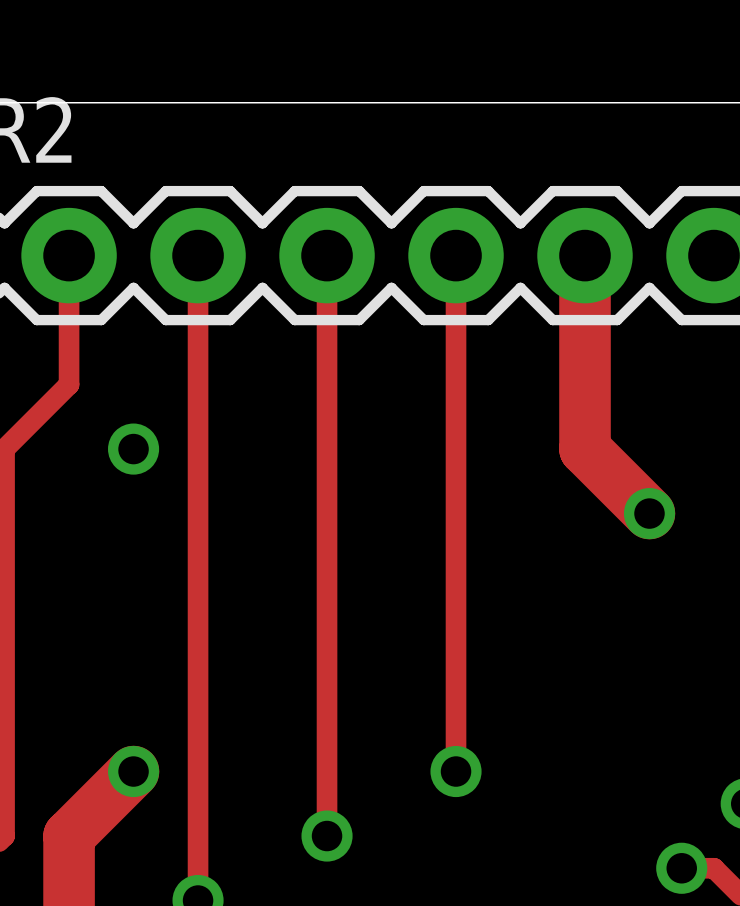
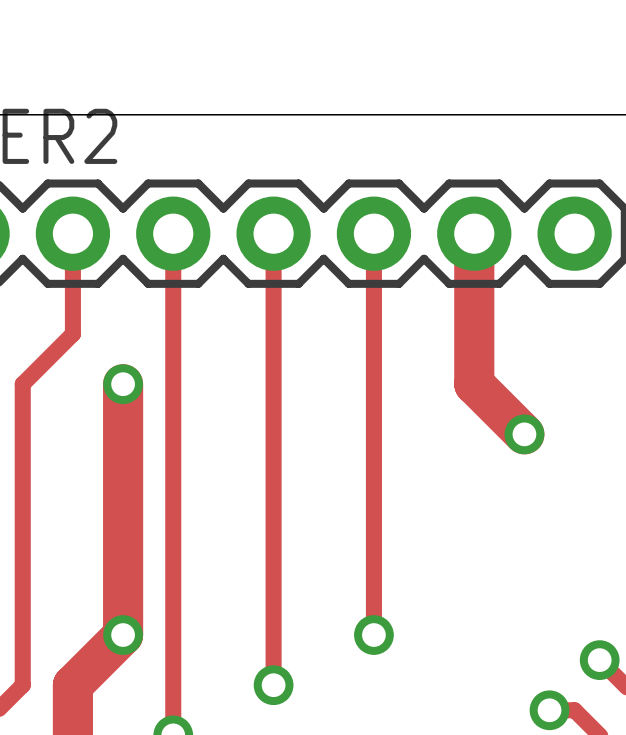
track: none -> (123, 384) (123, 635)

